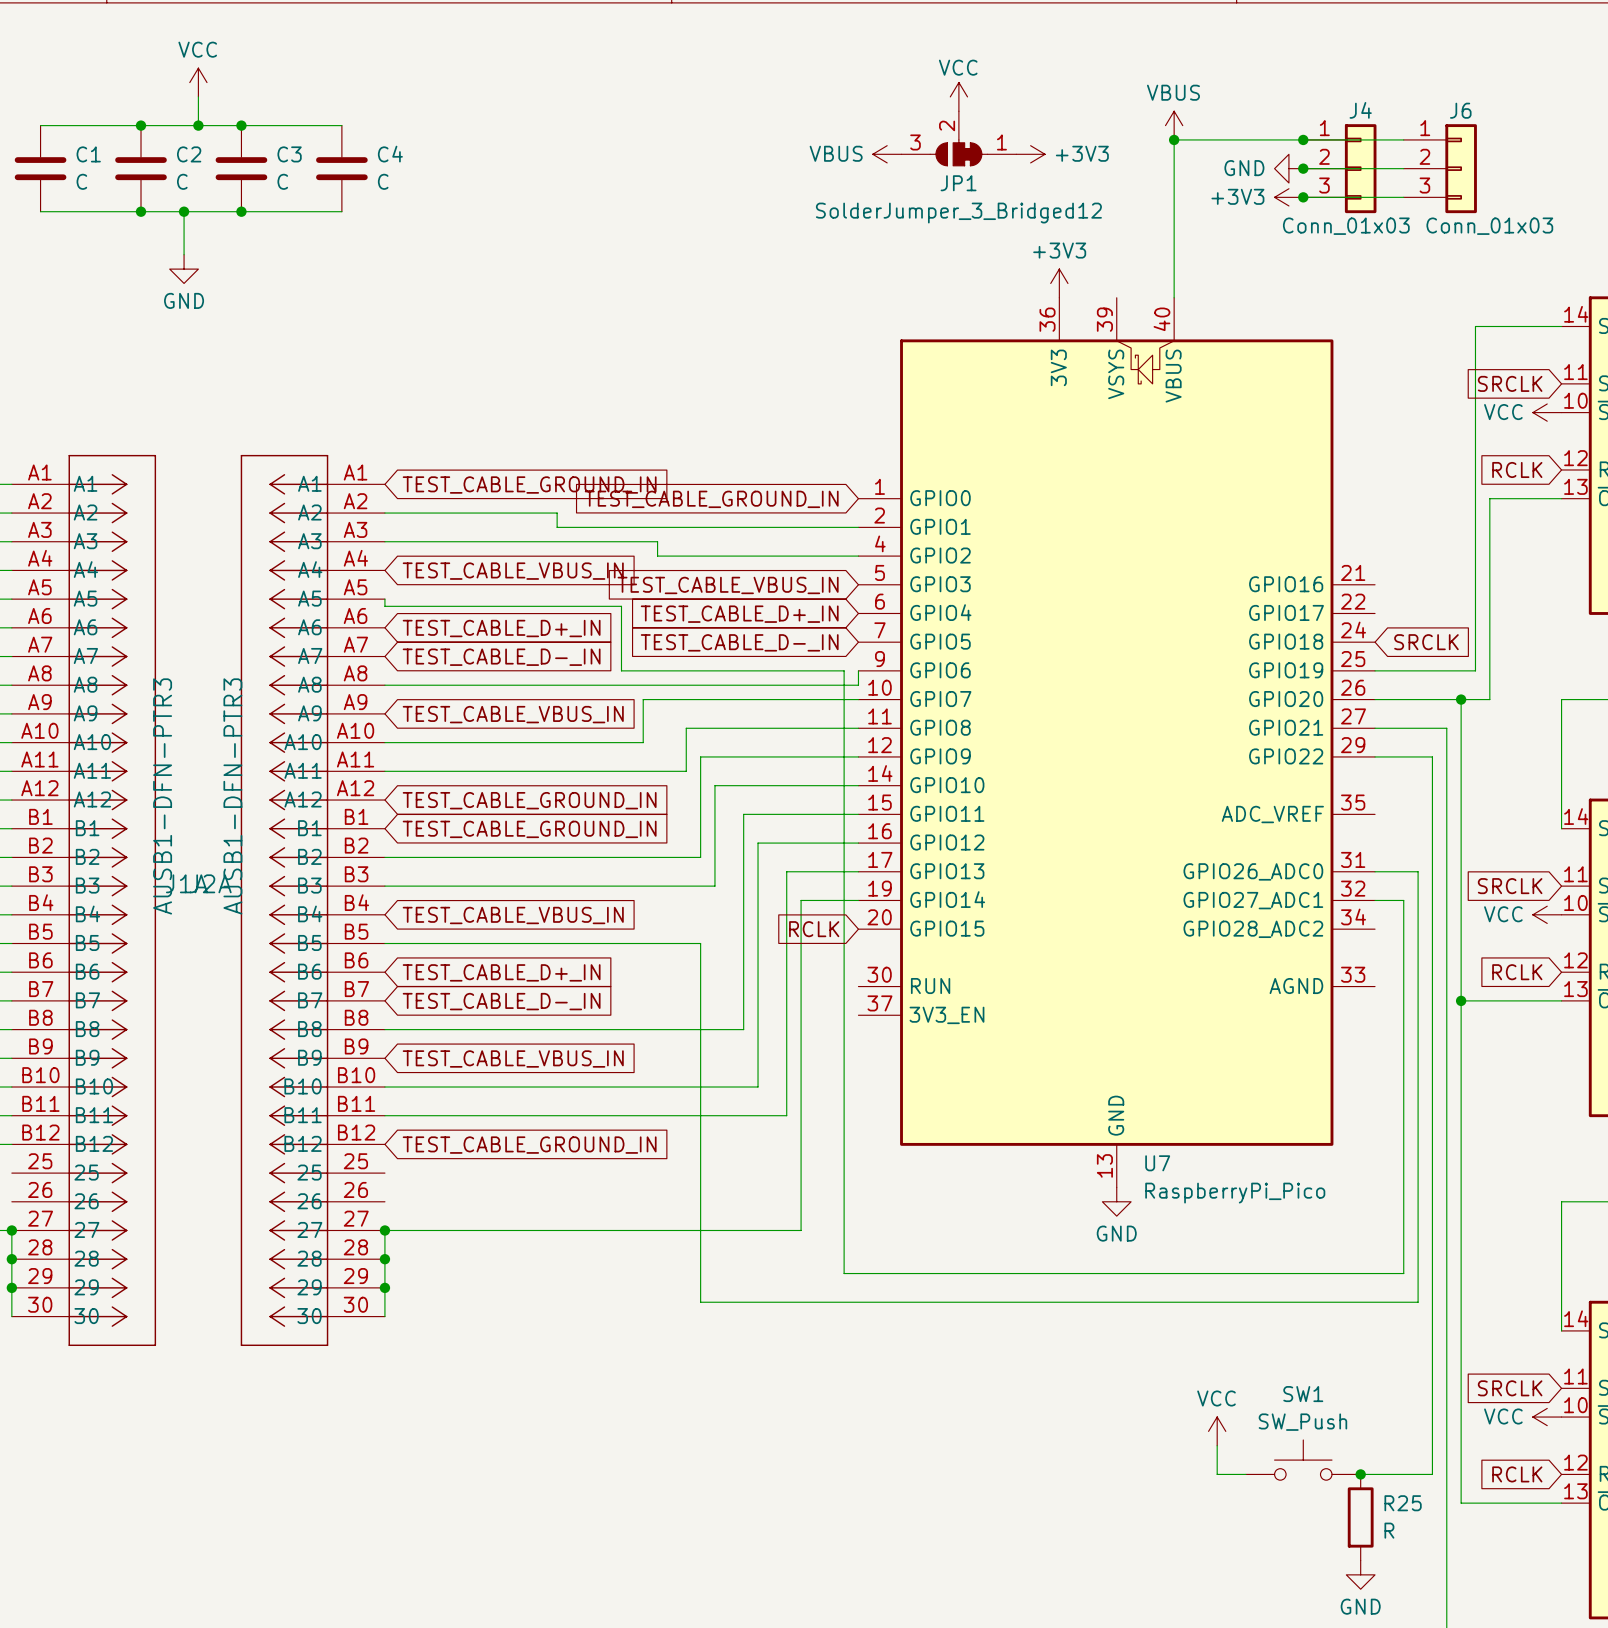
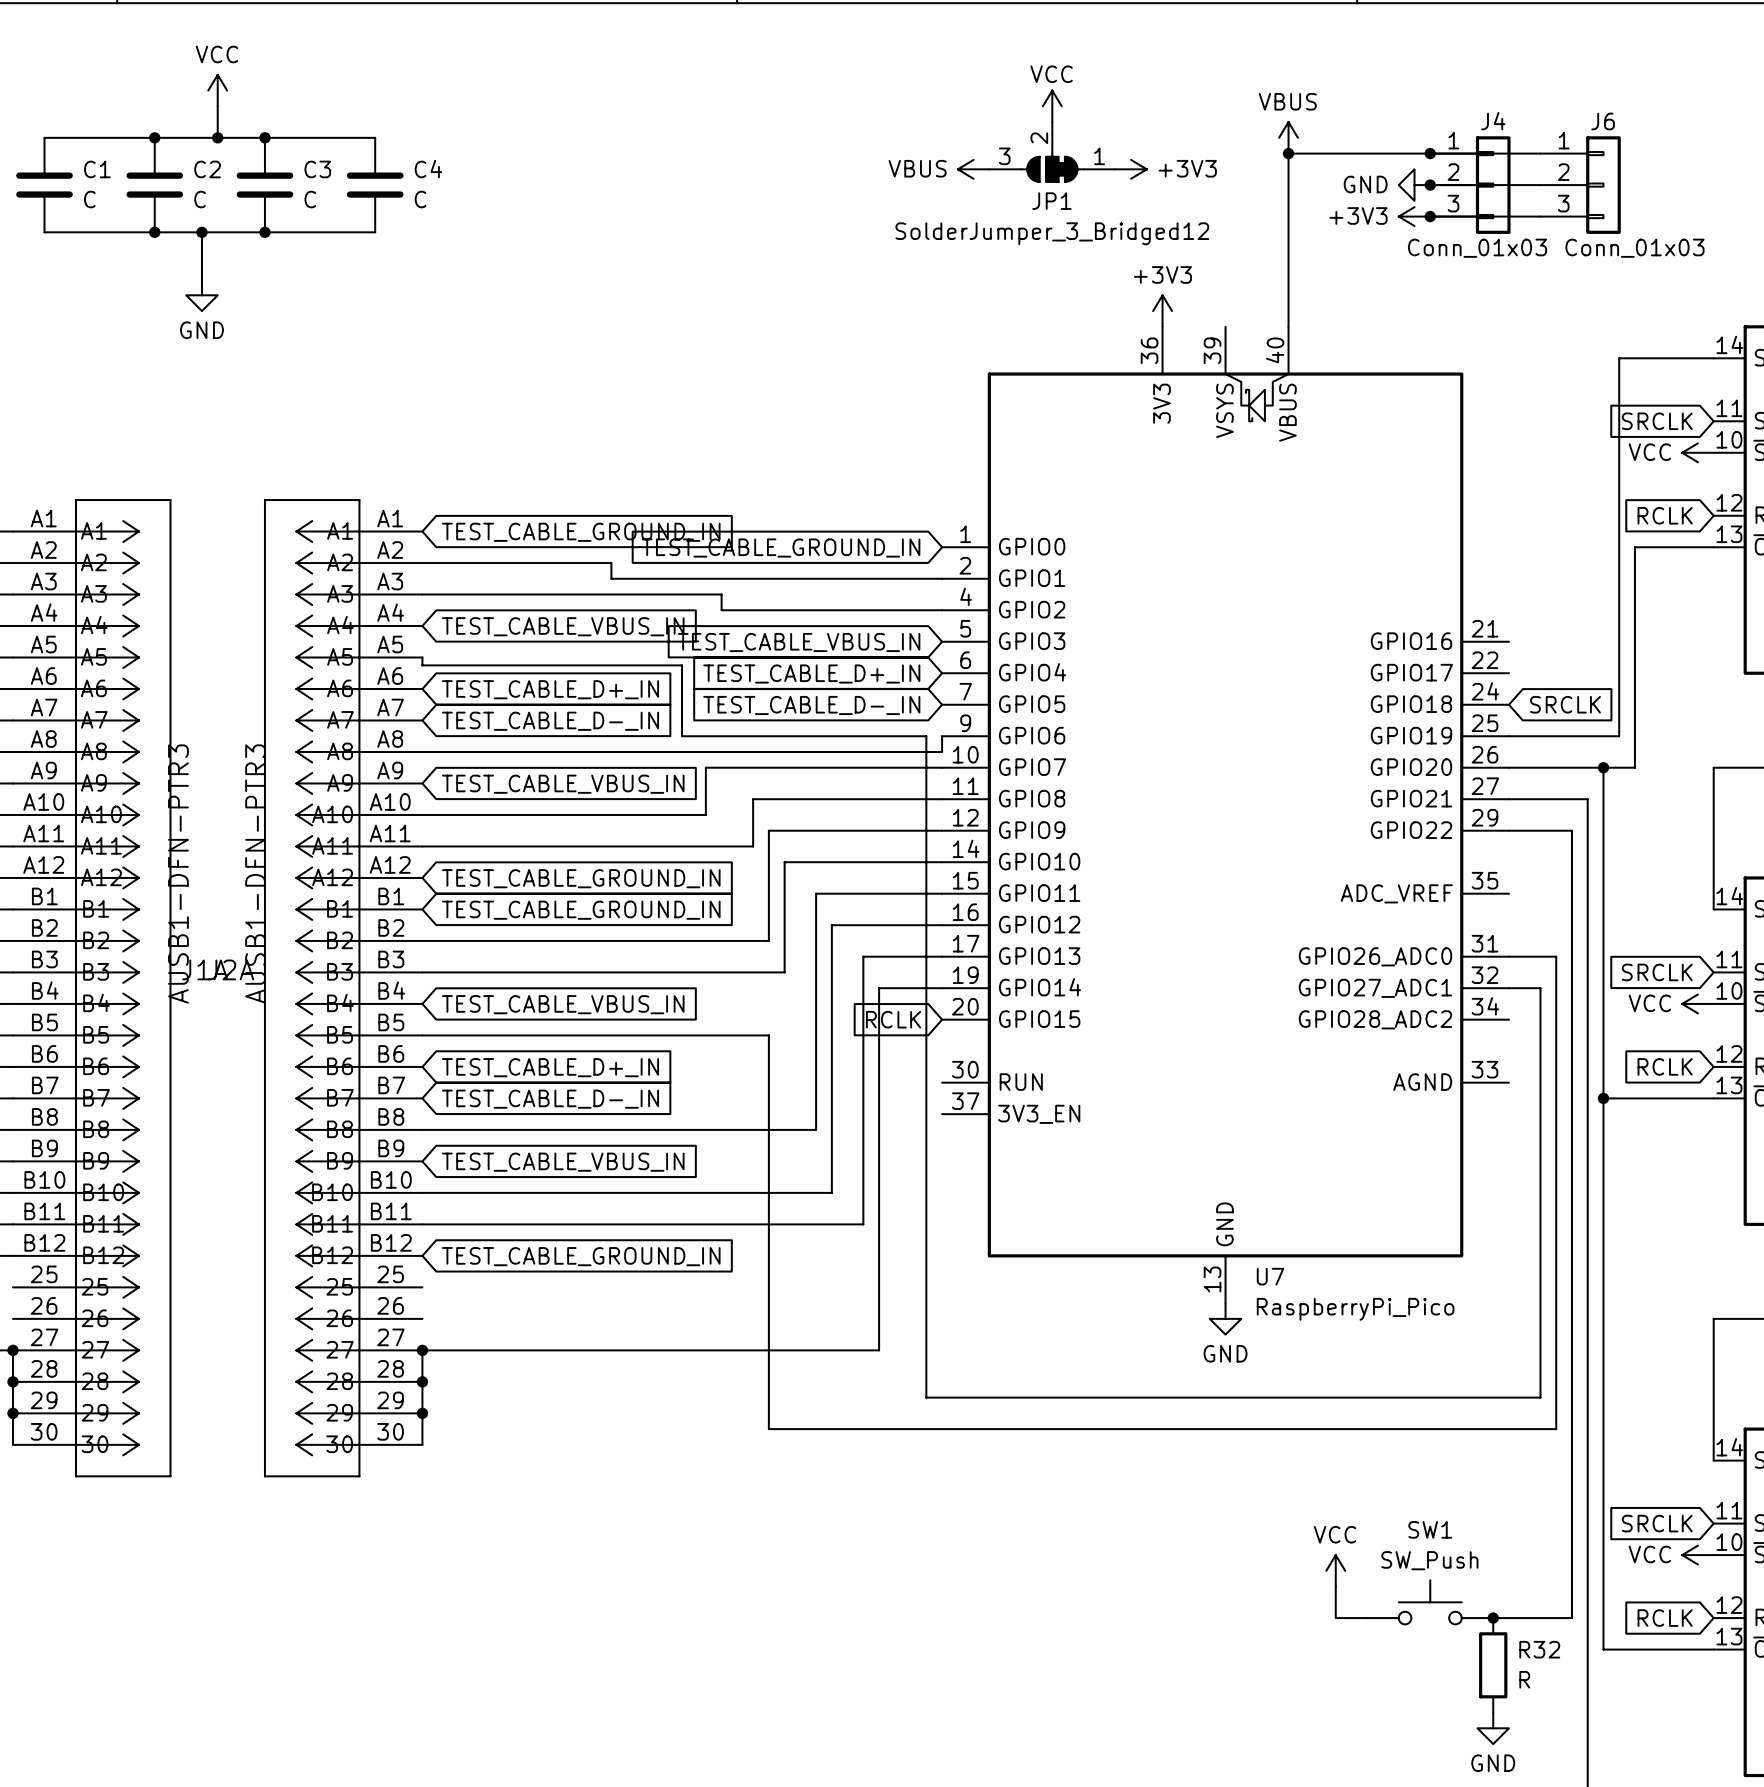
R25 name: R25 (1403, 1503) -> R32 (1539, 1649)

